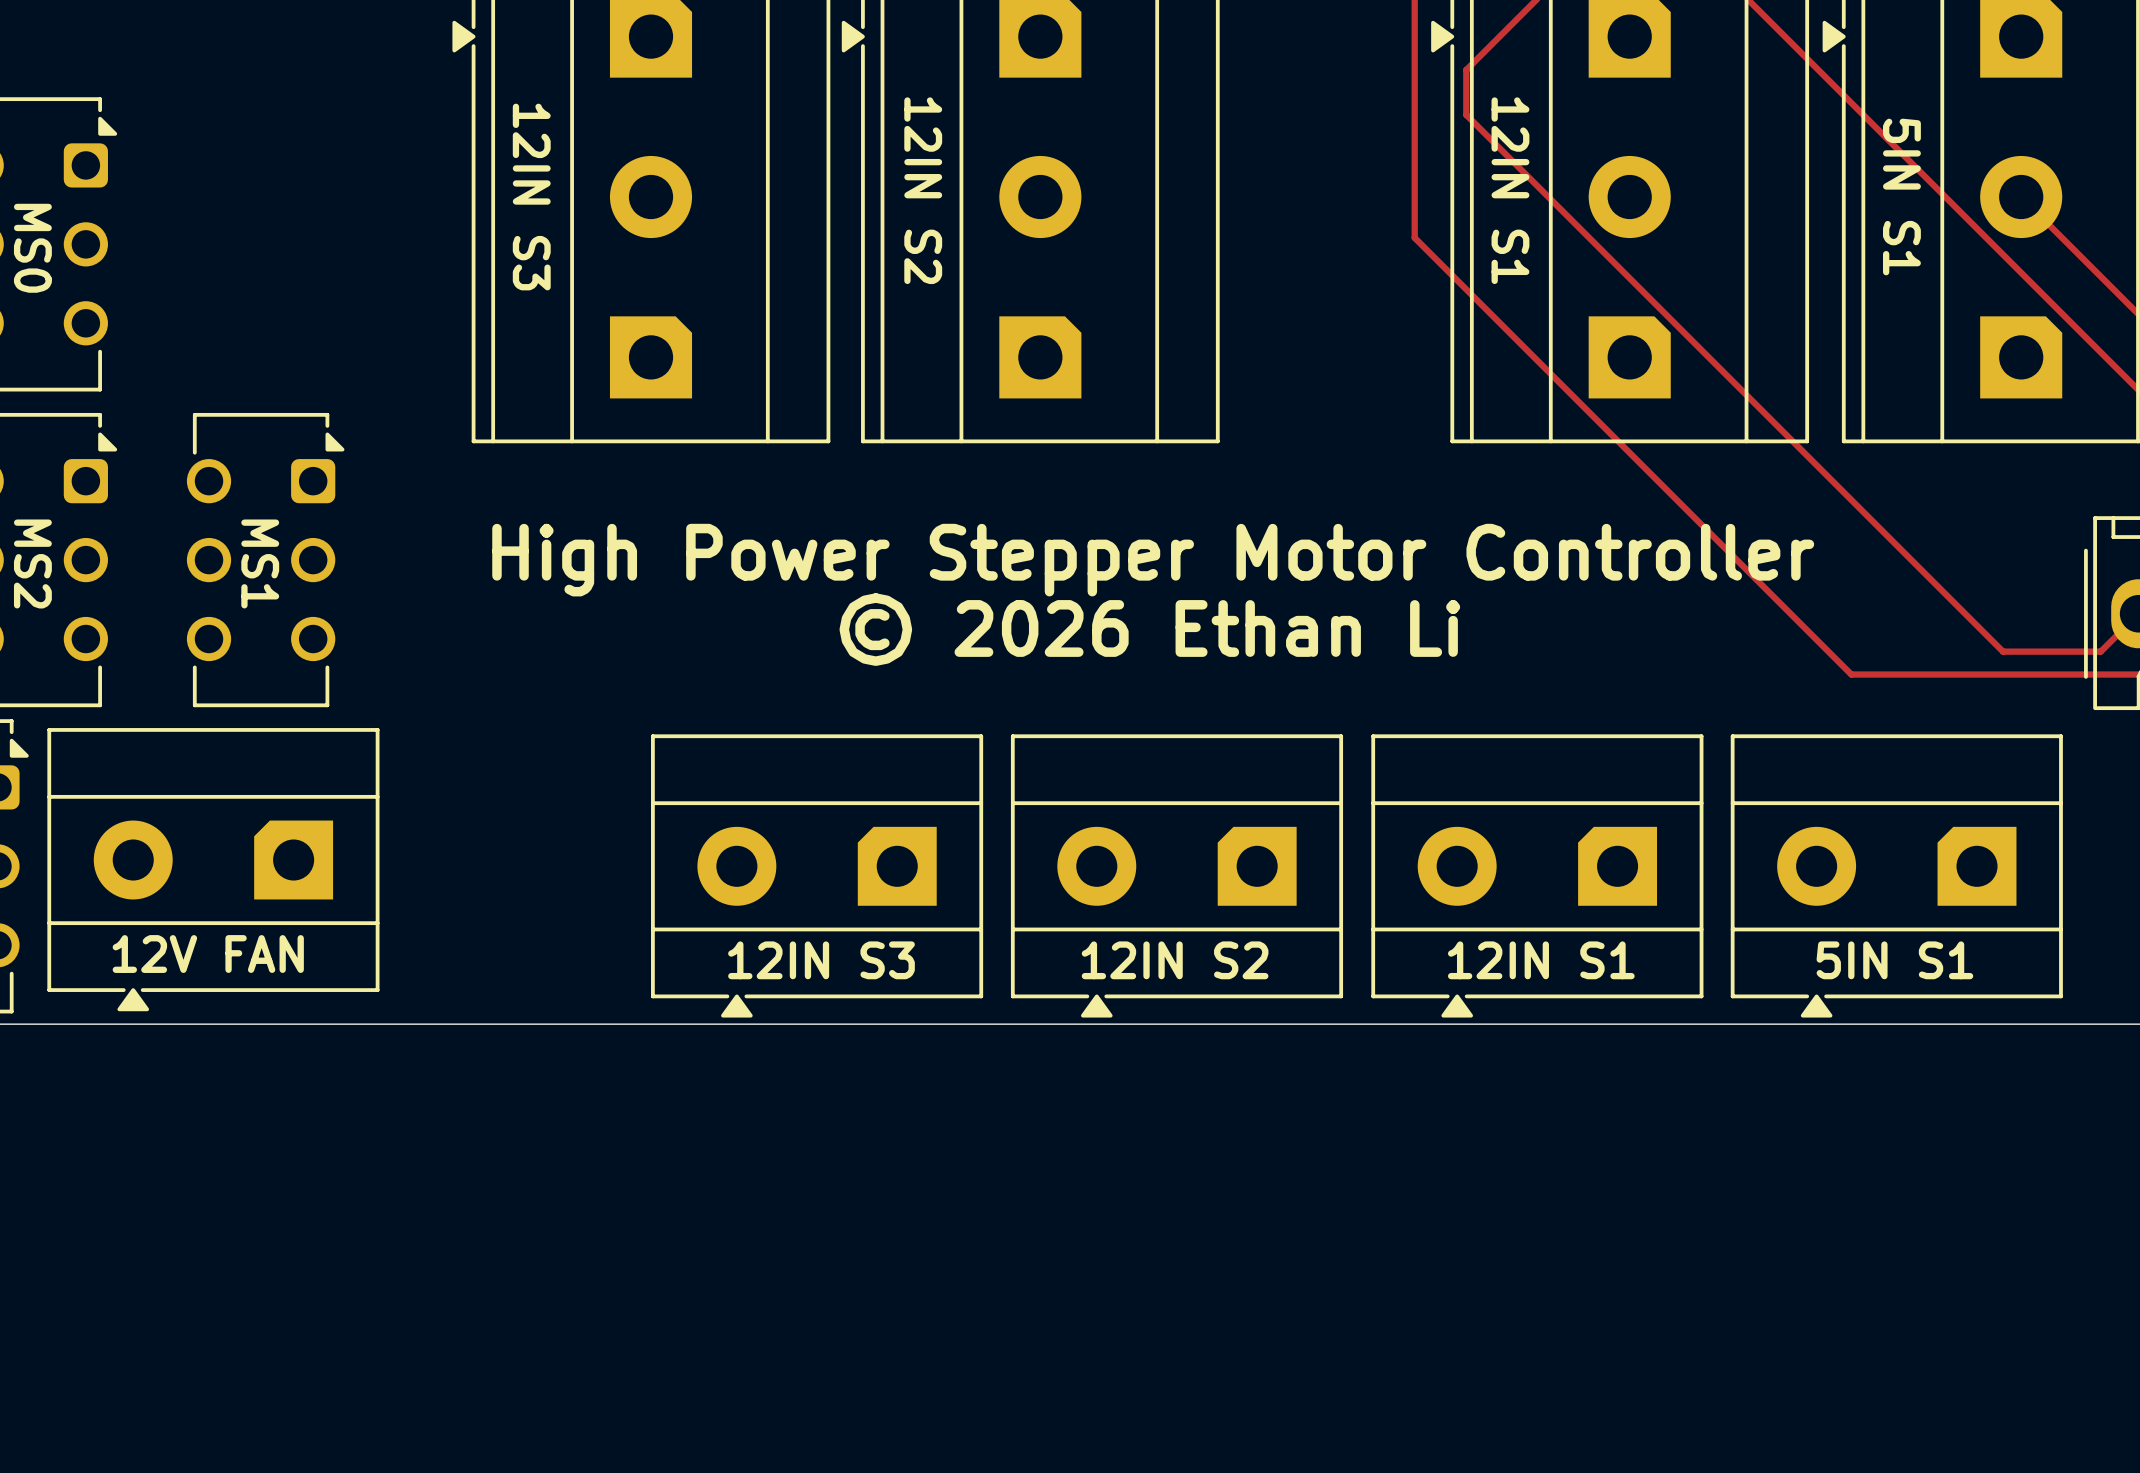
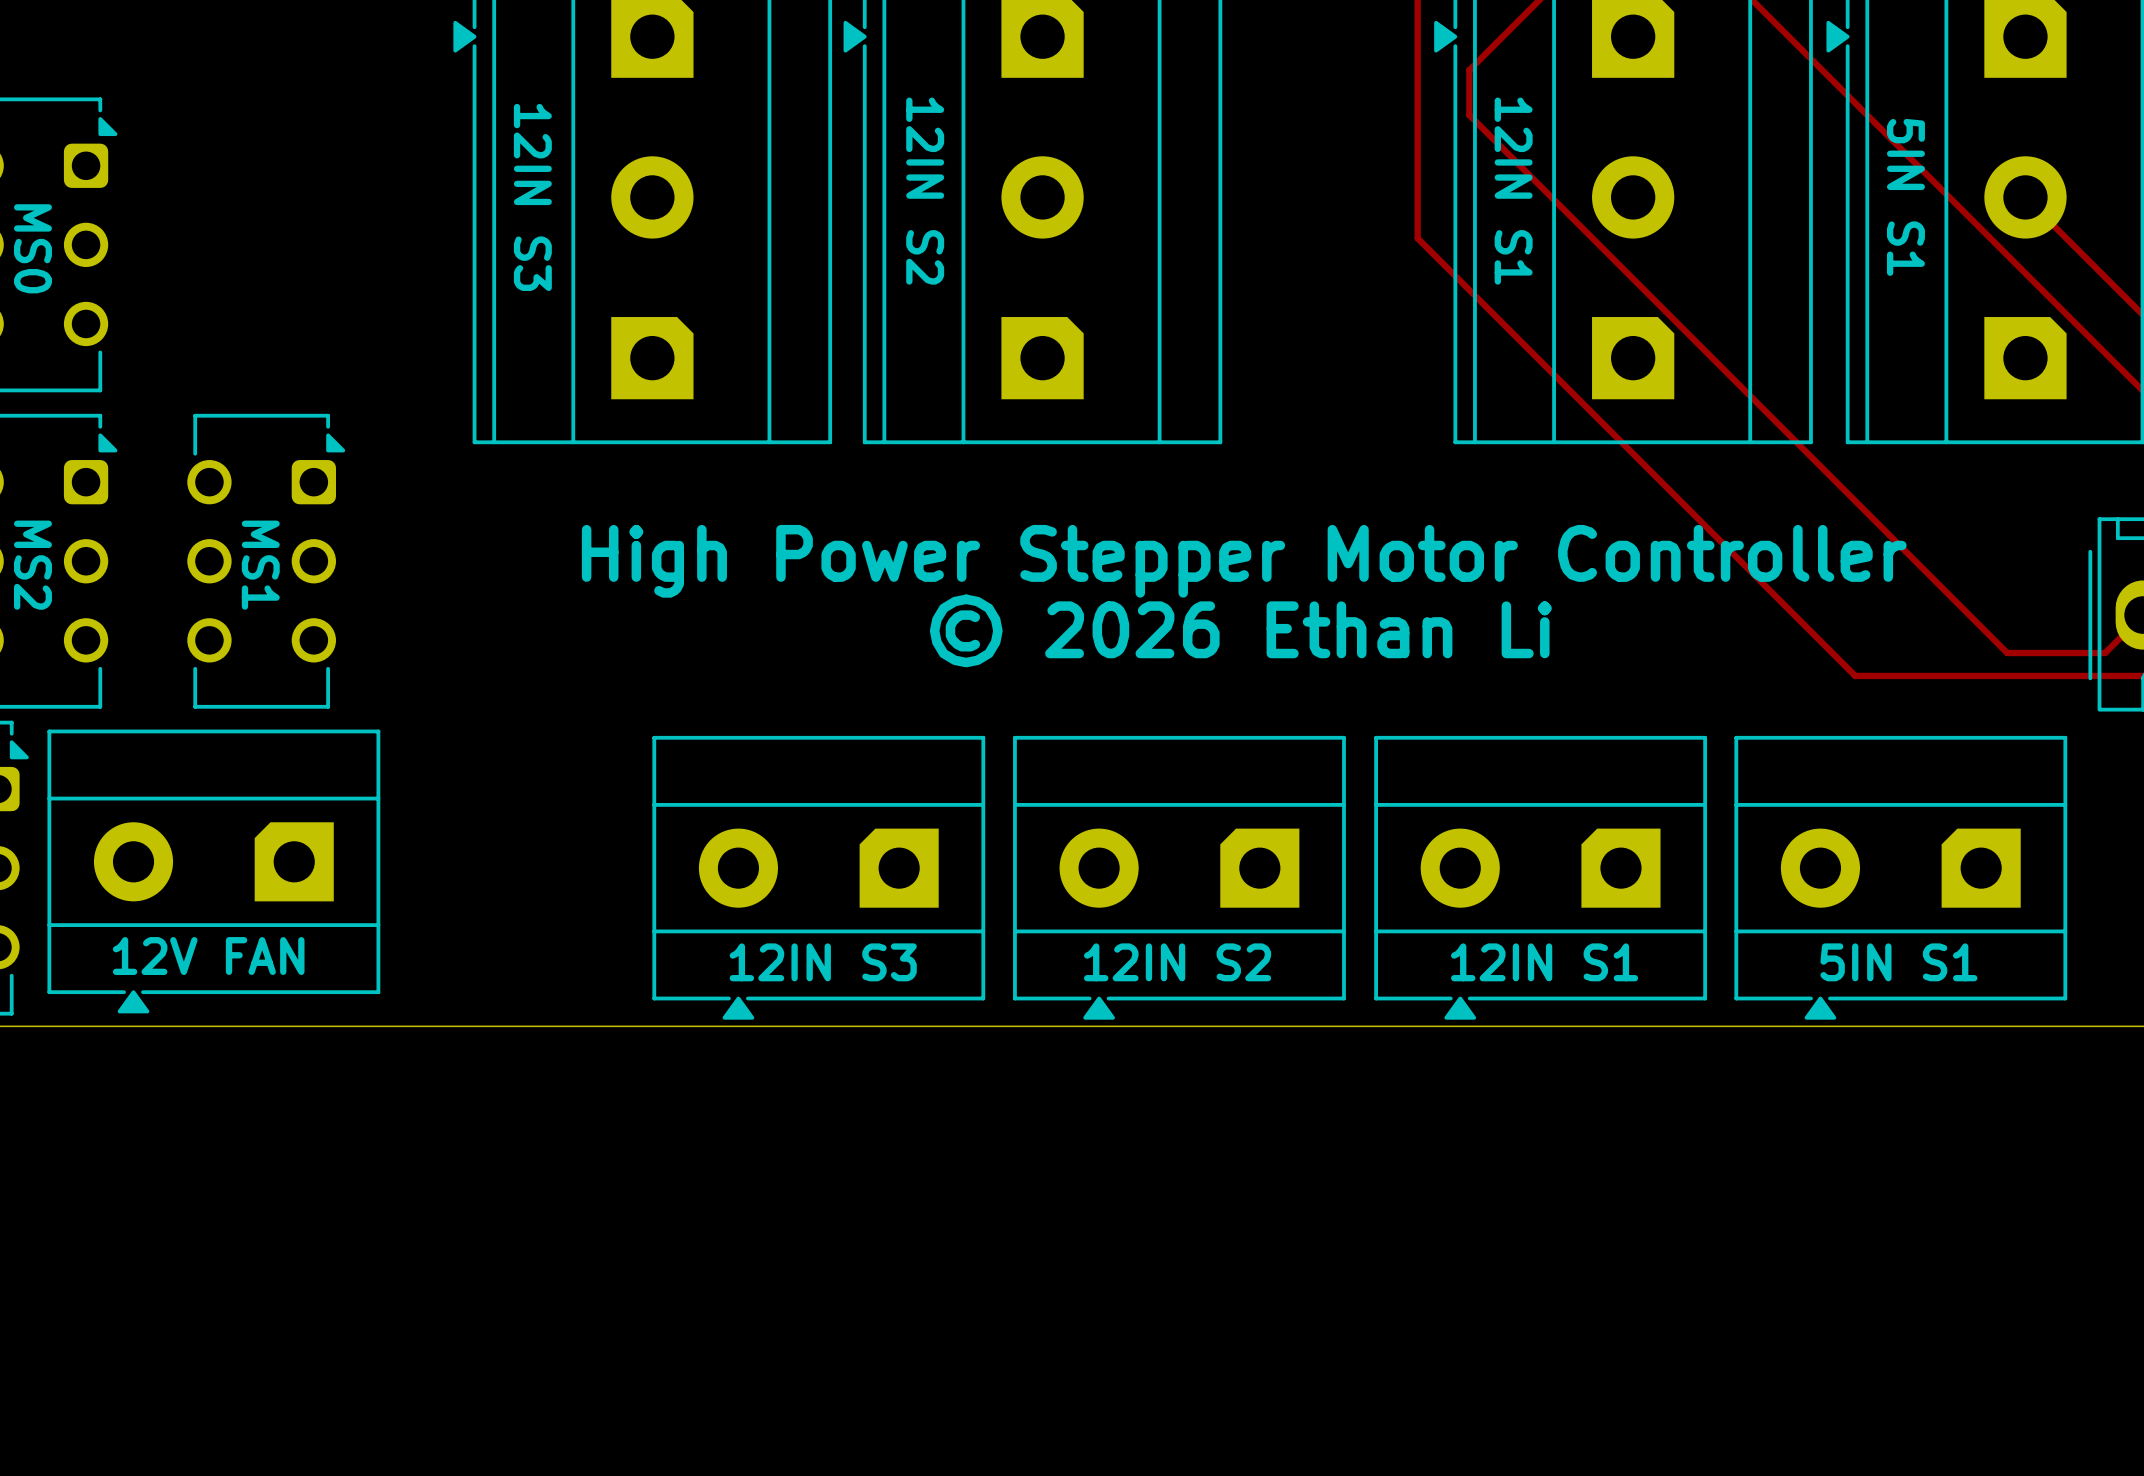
text position: High Power Stepper Motor Controller (1153, 560) -> High Power Stepper Motor Controller (1244, 561)
text position: © 2026 Ethan Li (1149, 629) -> © 2026 Ethan Li (1240, 630)

